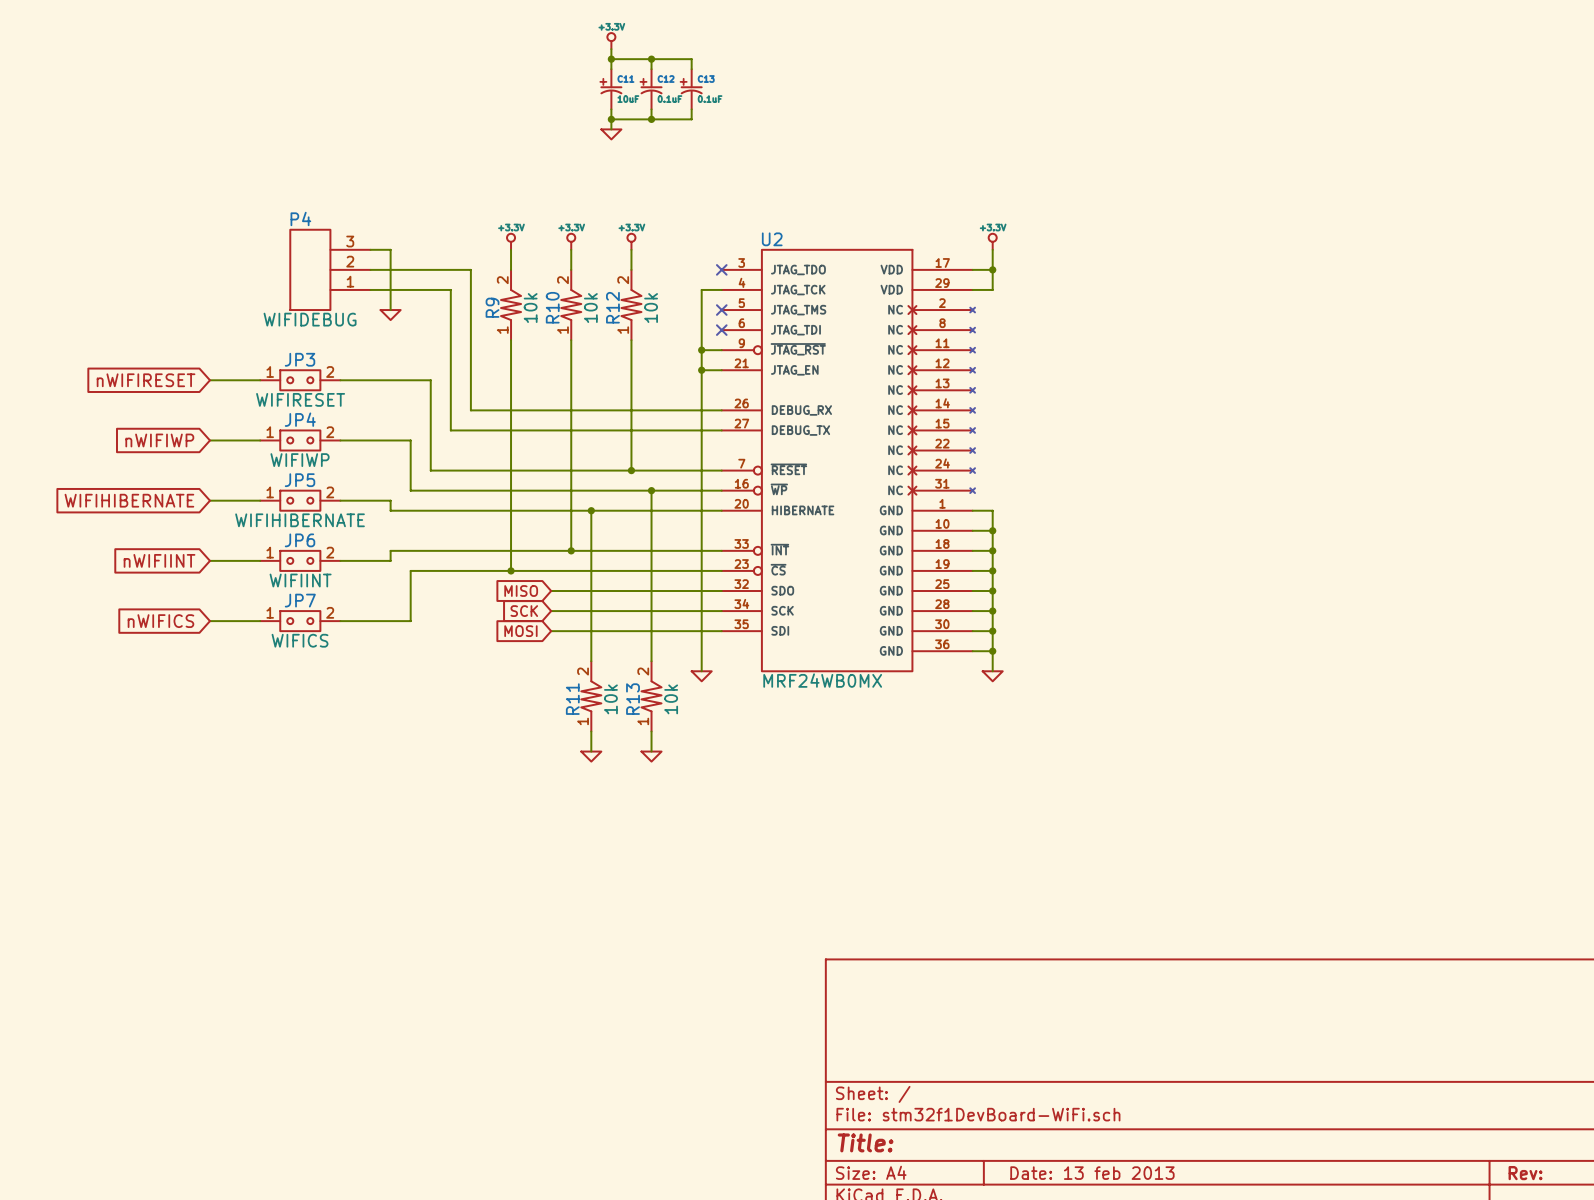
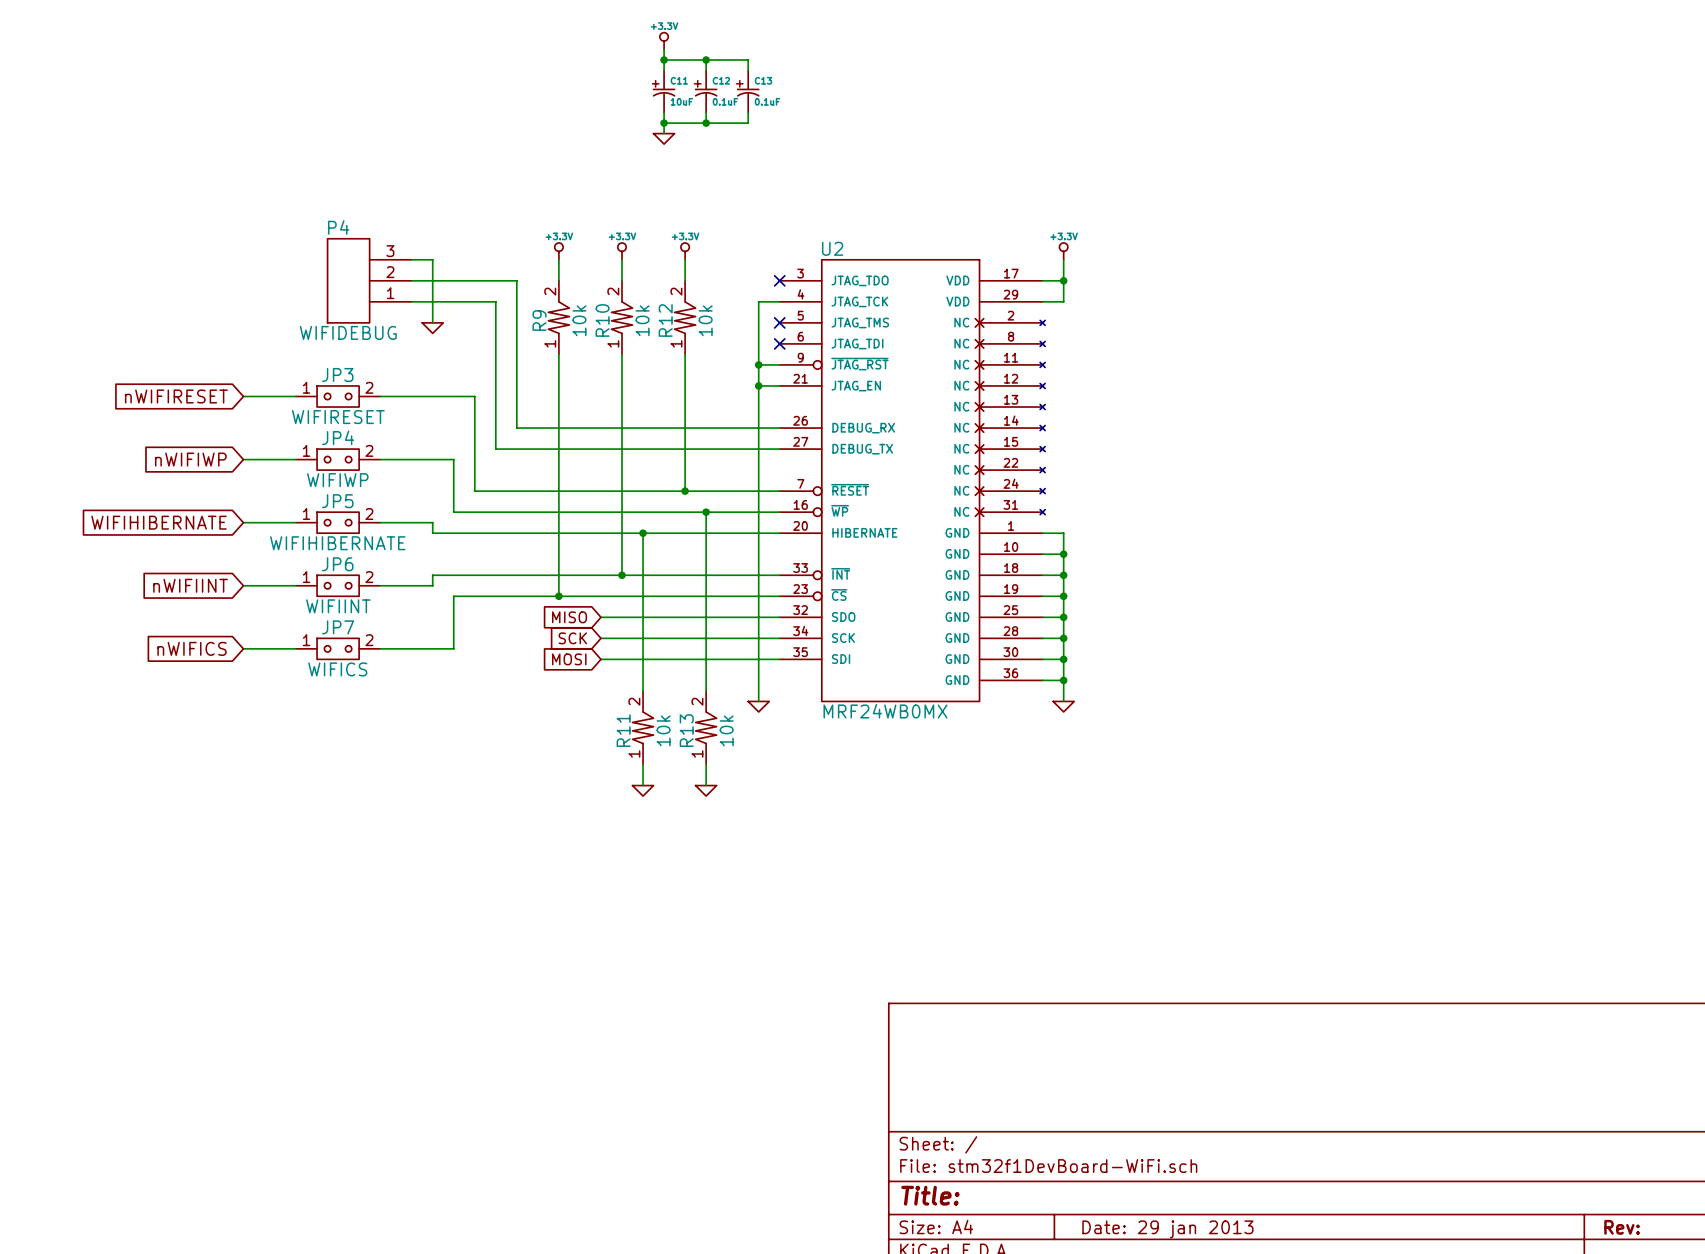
title block: Date: 13 feb 2013 (1092, 1173) -> Date: 29 jan 2013 (1167, 1229)

